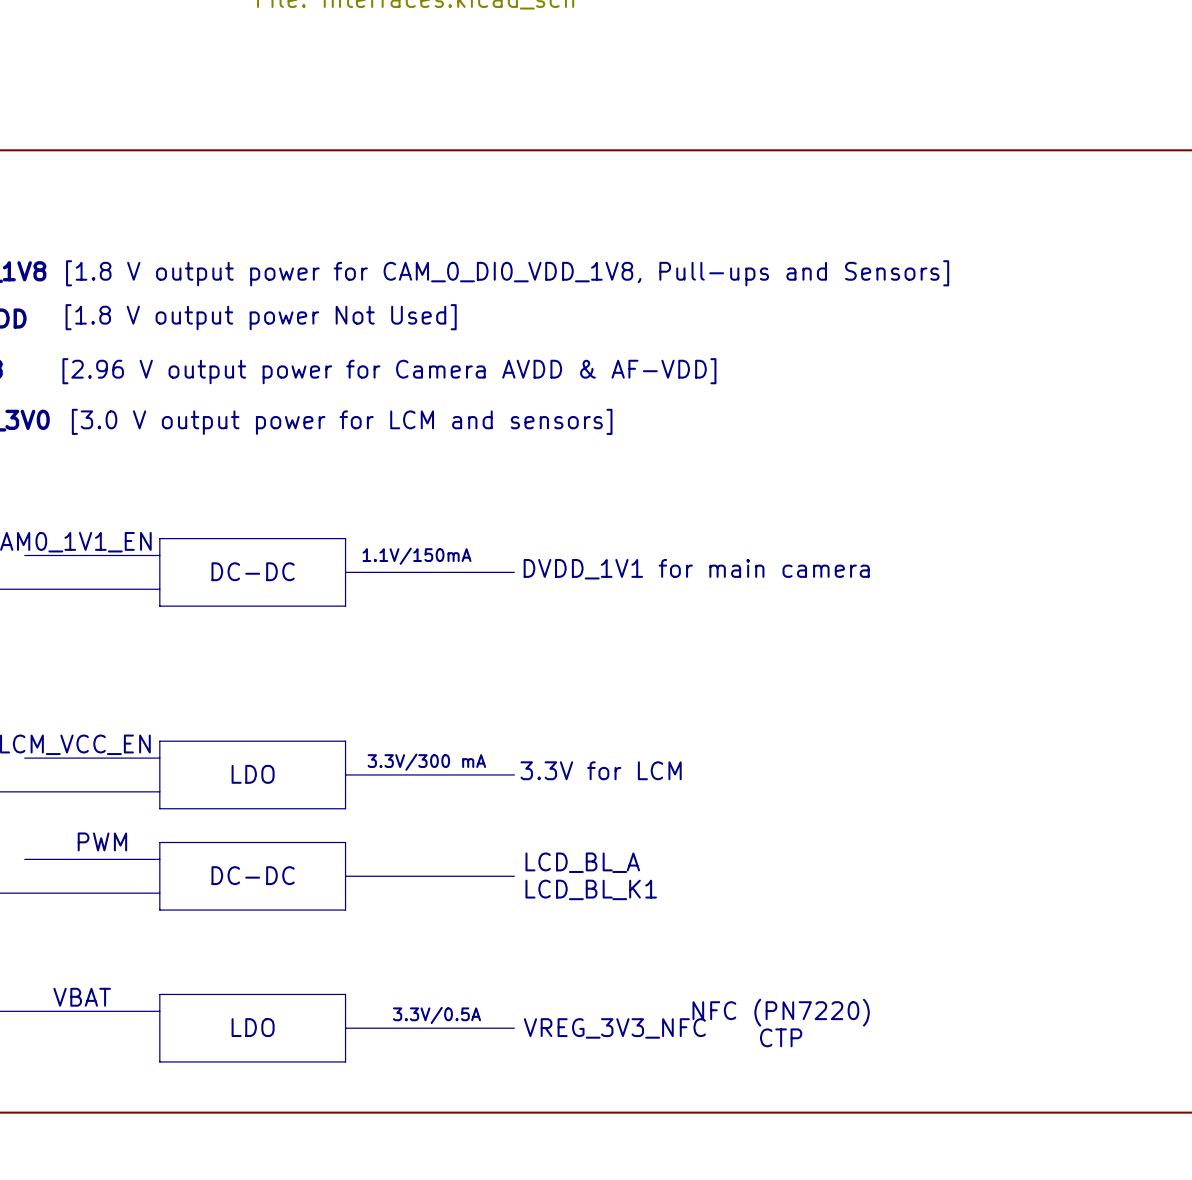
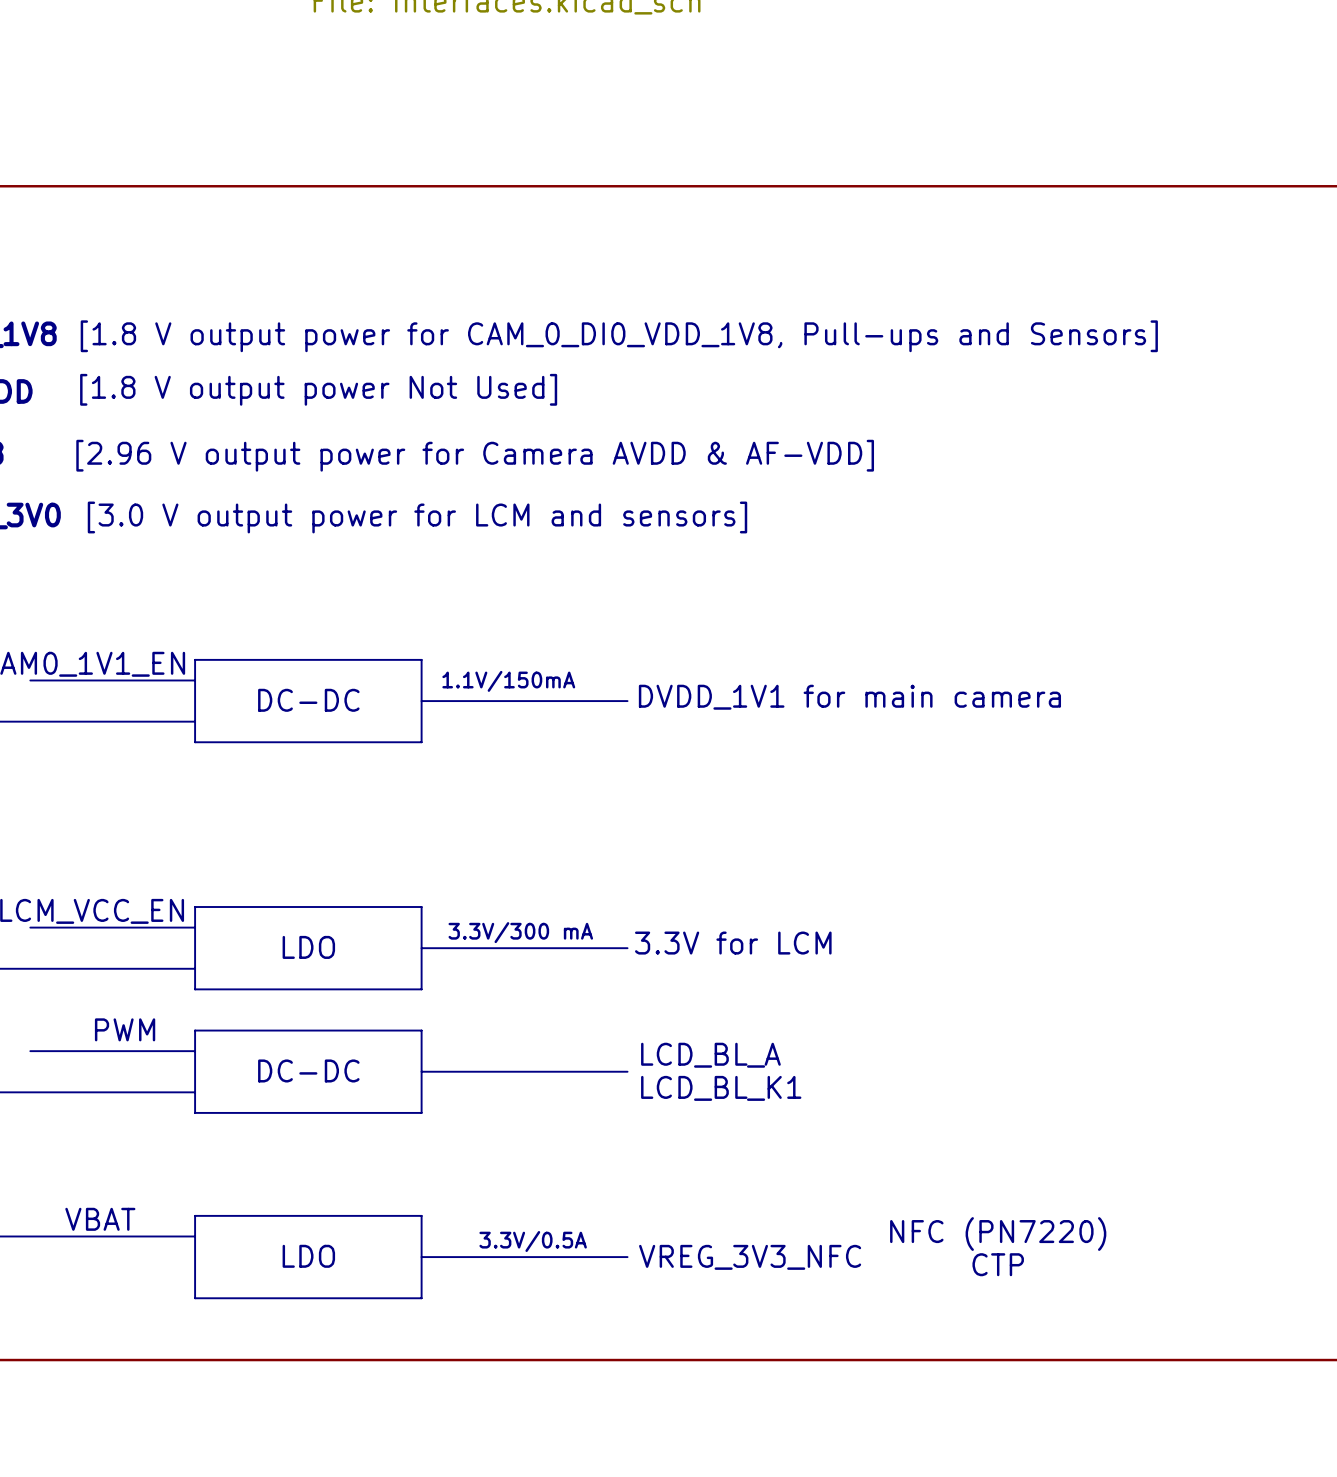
text position: NFC (PN7220) (781, 1012) -> NFC (PN7220) (998, 1234)
text position: CTP (781, 1037) -> CTP (998, 1264)

